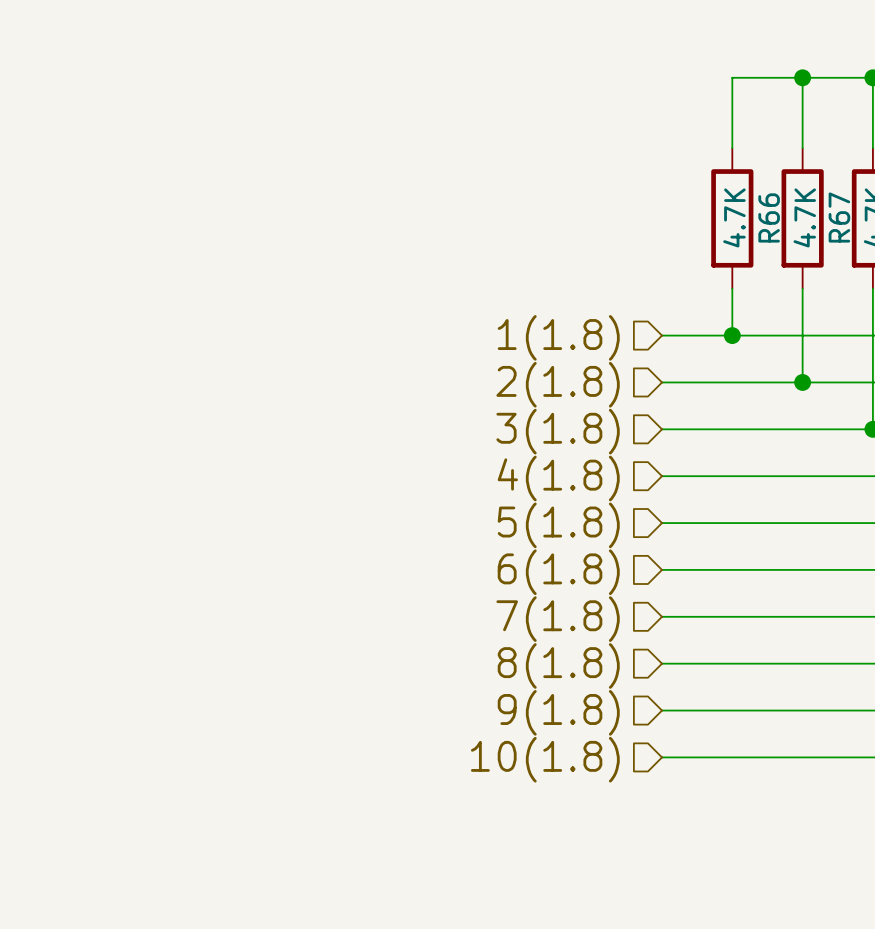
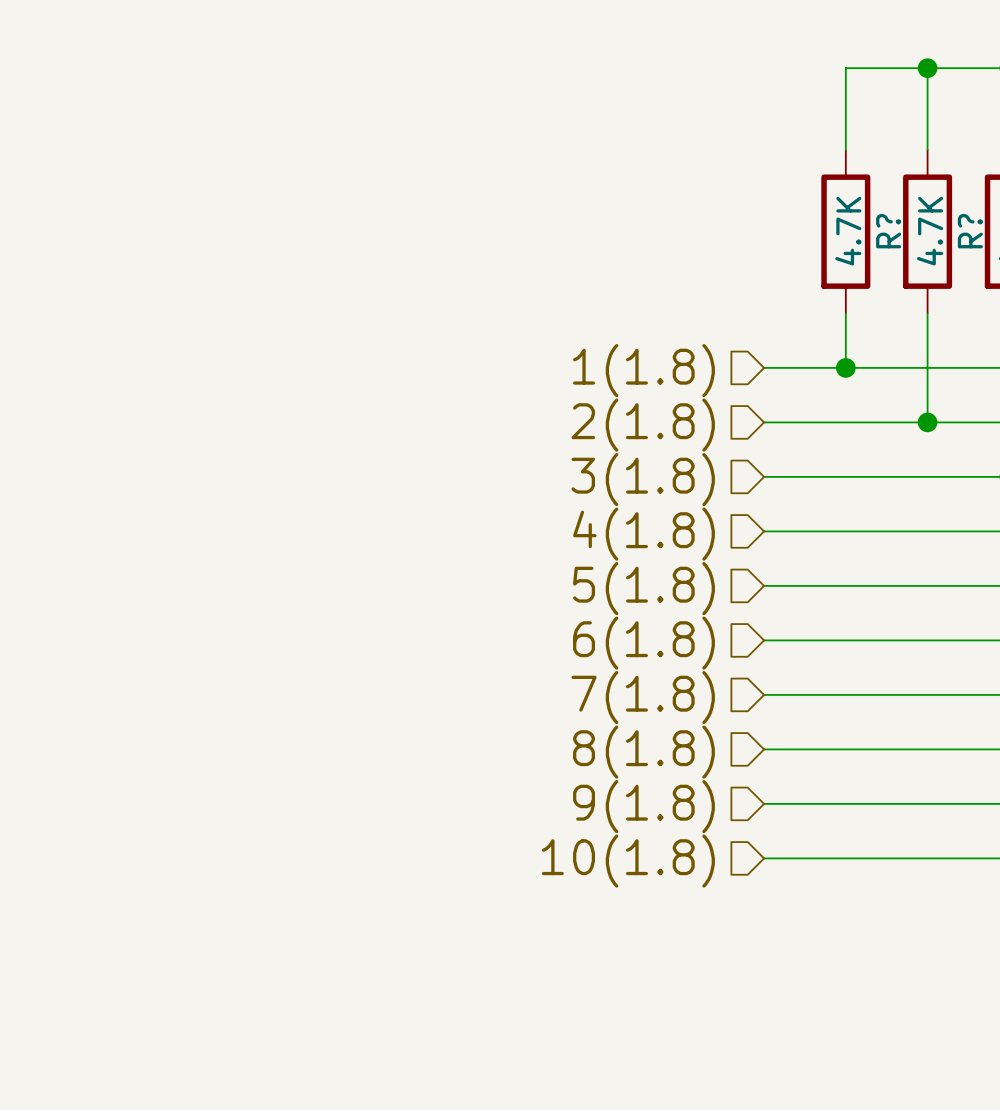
R66 name: R66 (769, 217) -> R? (888, 231)
R67 name: R67 (839, 217) -> R? (970, 231)

